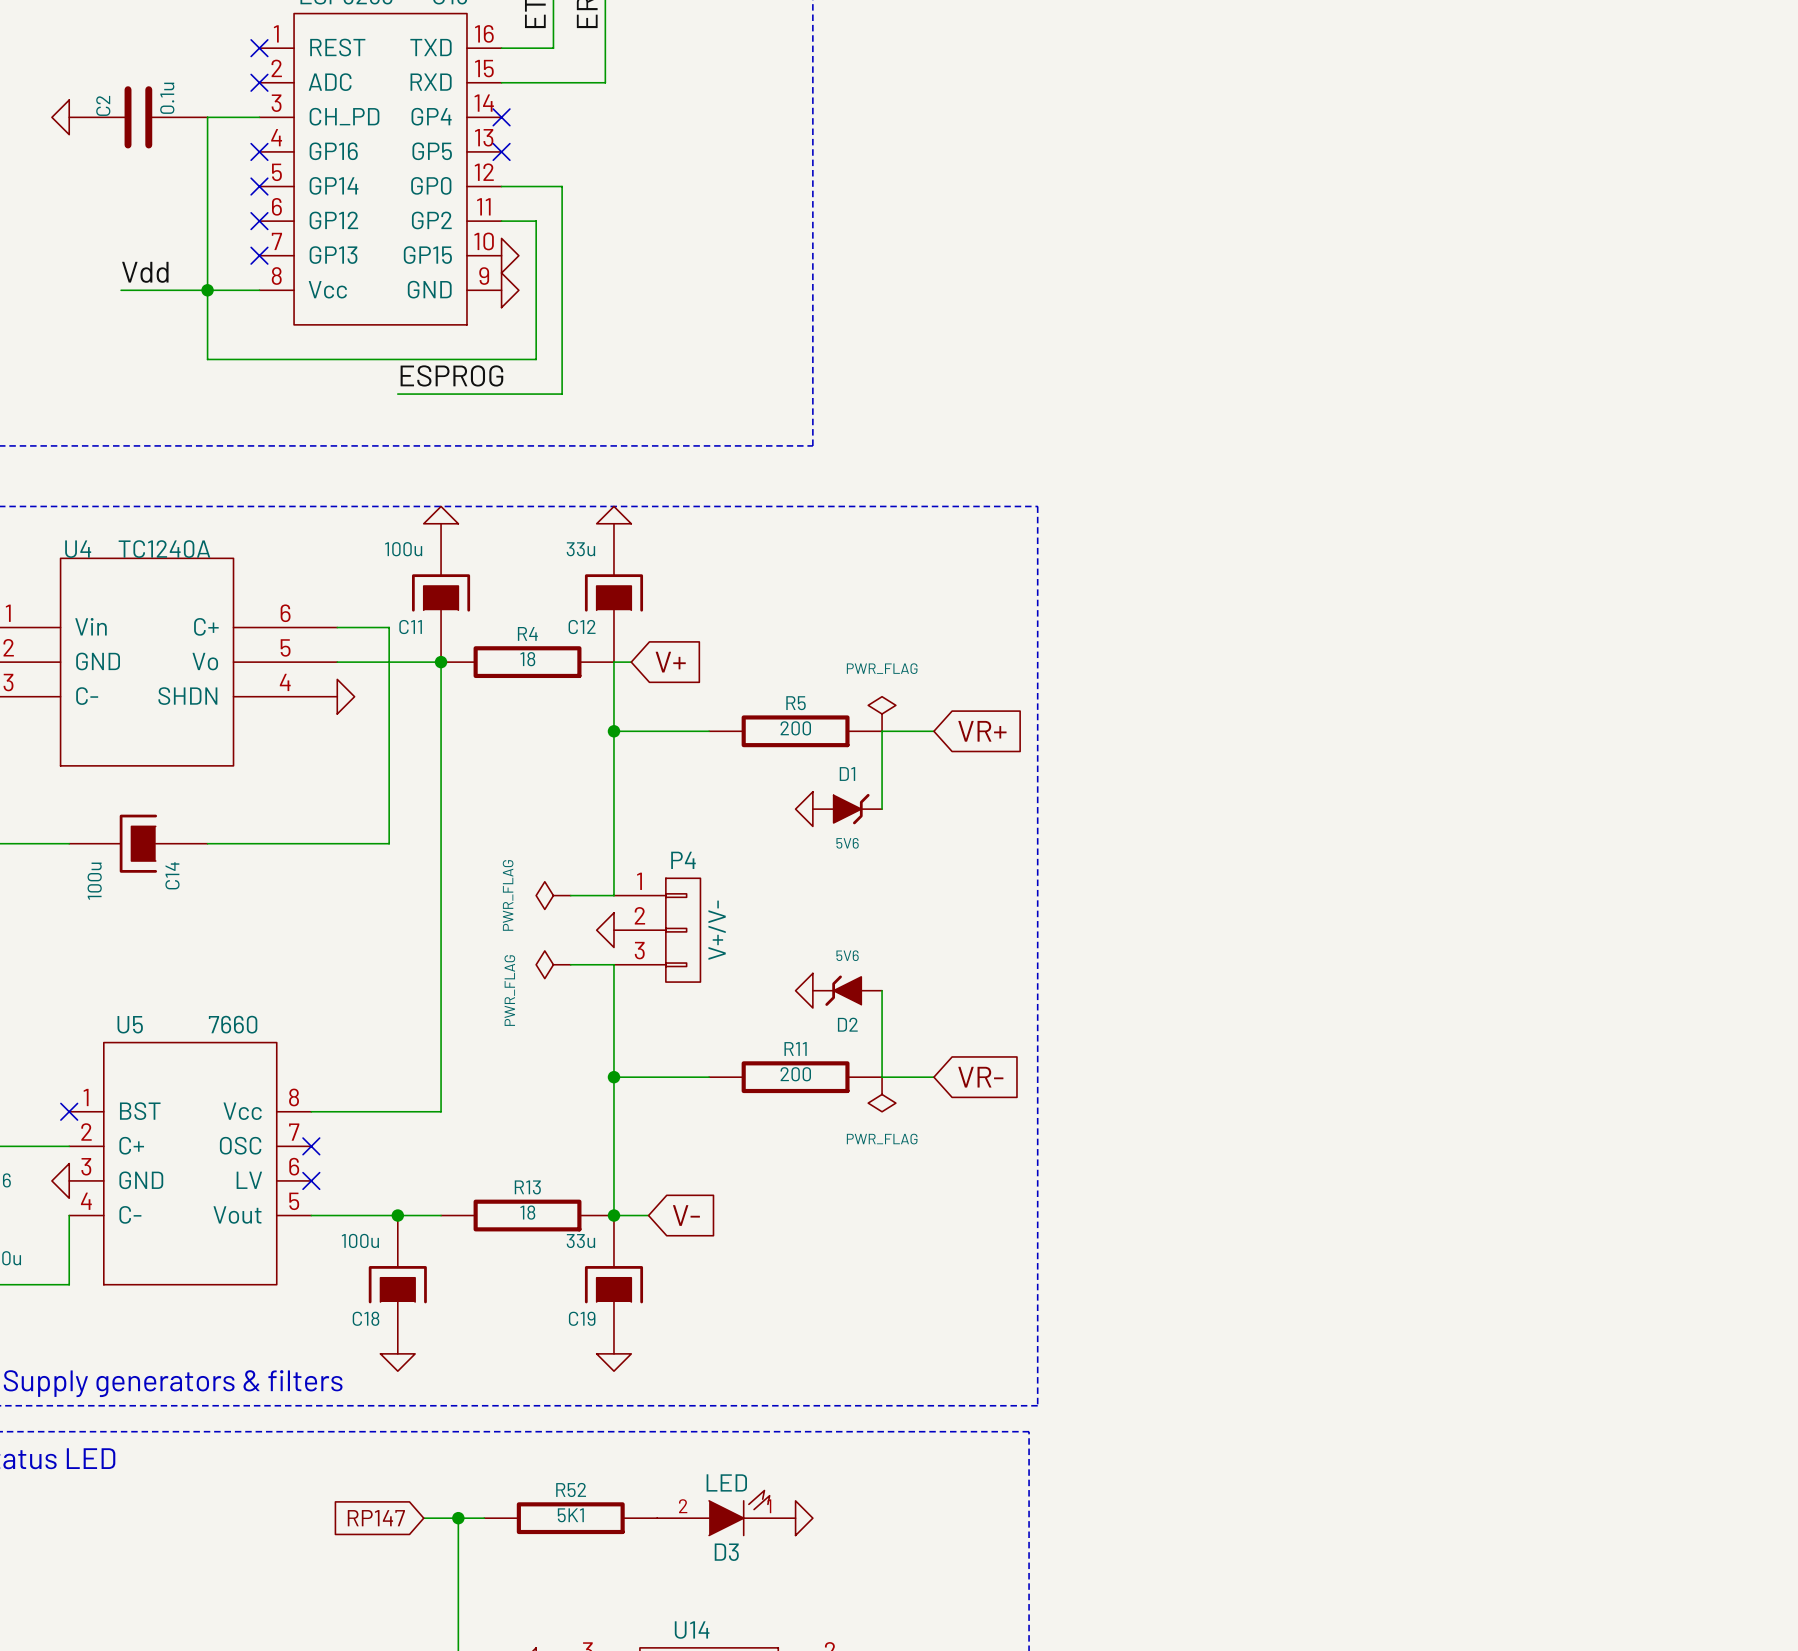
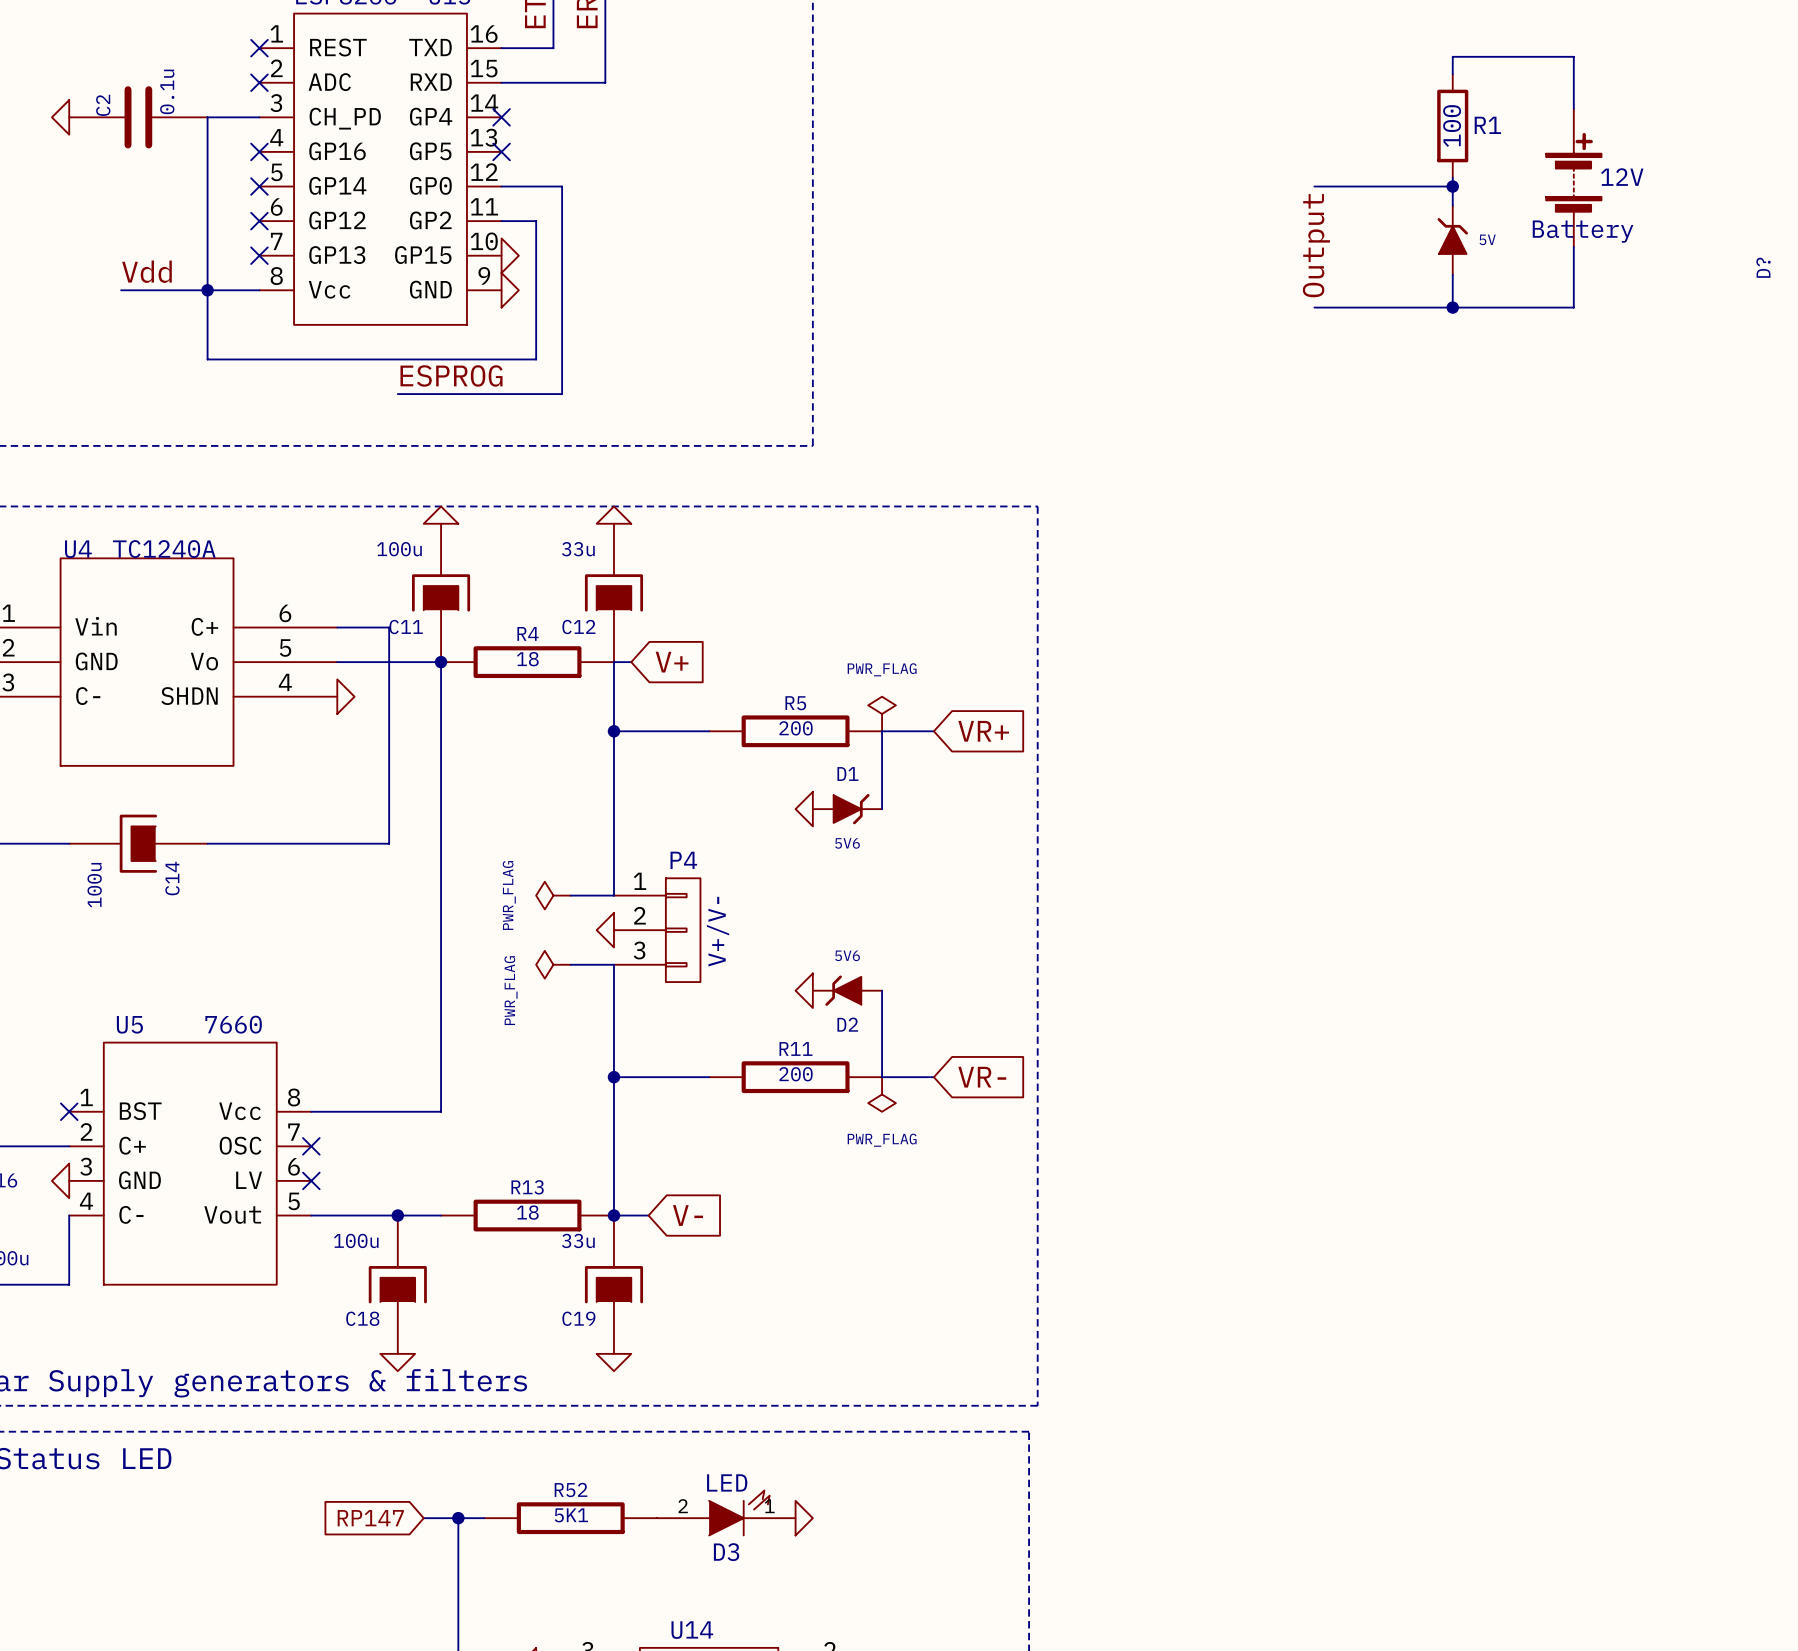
wire: none -> (1452, 74) (1452, 56) (1573, 56) (1573, 108)
R1: none -> 100 (1452, 125)
wire: none -> (1452, 177) (1452, 205)
Battery: none -> 12V (1573, 177)
wire: none -> (1314, 186) (1452, 186)
junction: none -> (1452, 186)
D?: none -> 5V (1452, 240)
wire: none -> (1573, 247) (1573, 307) (1314, 307)
label: none -> Output (1316, 245)
wire: none -> (1452, 274) (1452, 307)
junction: none -> (1452, 307)

